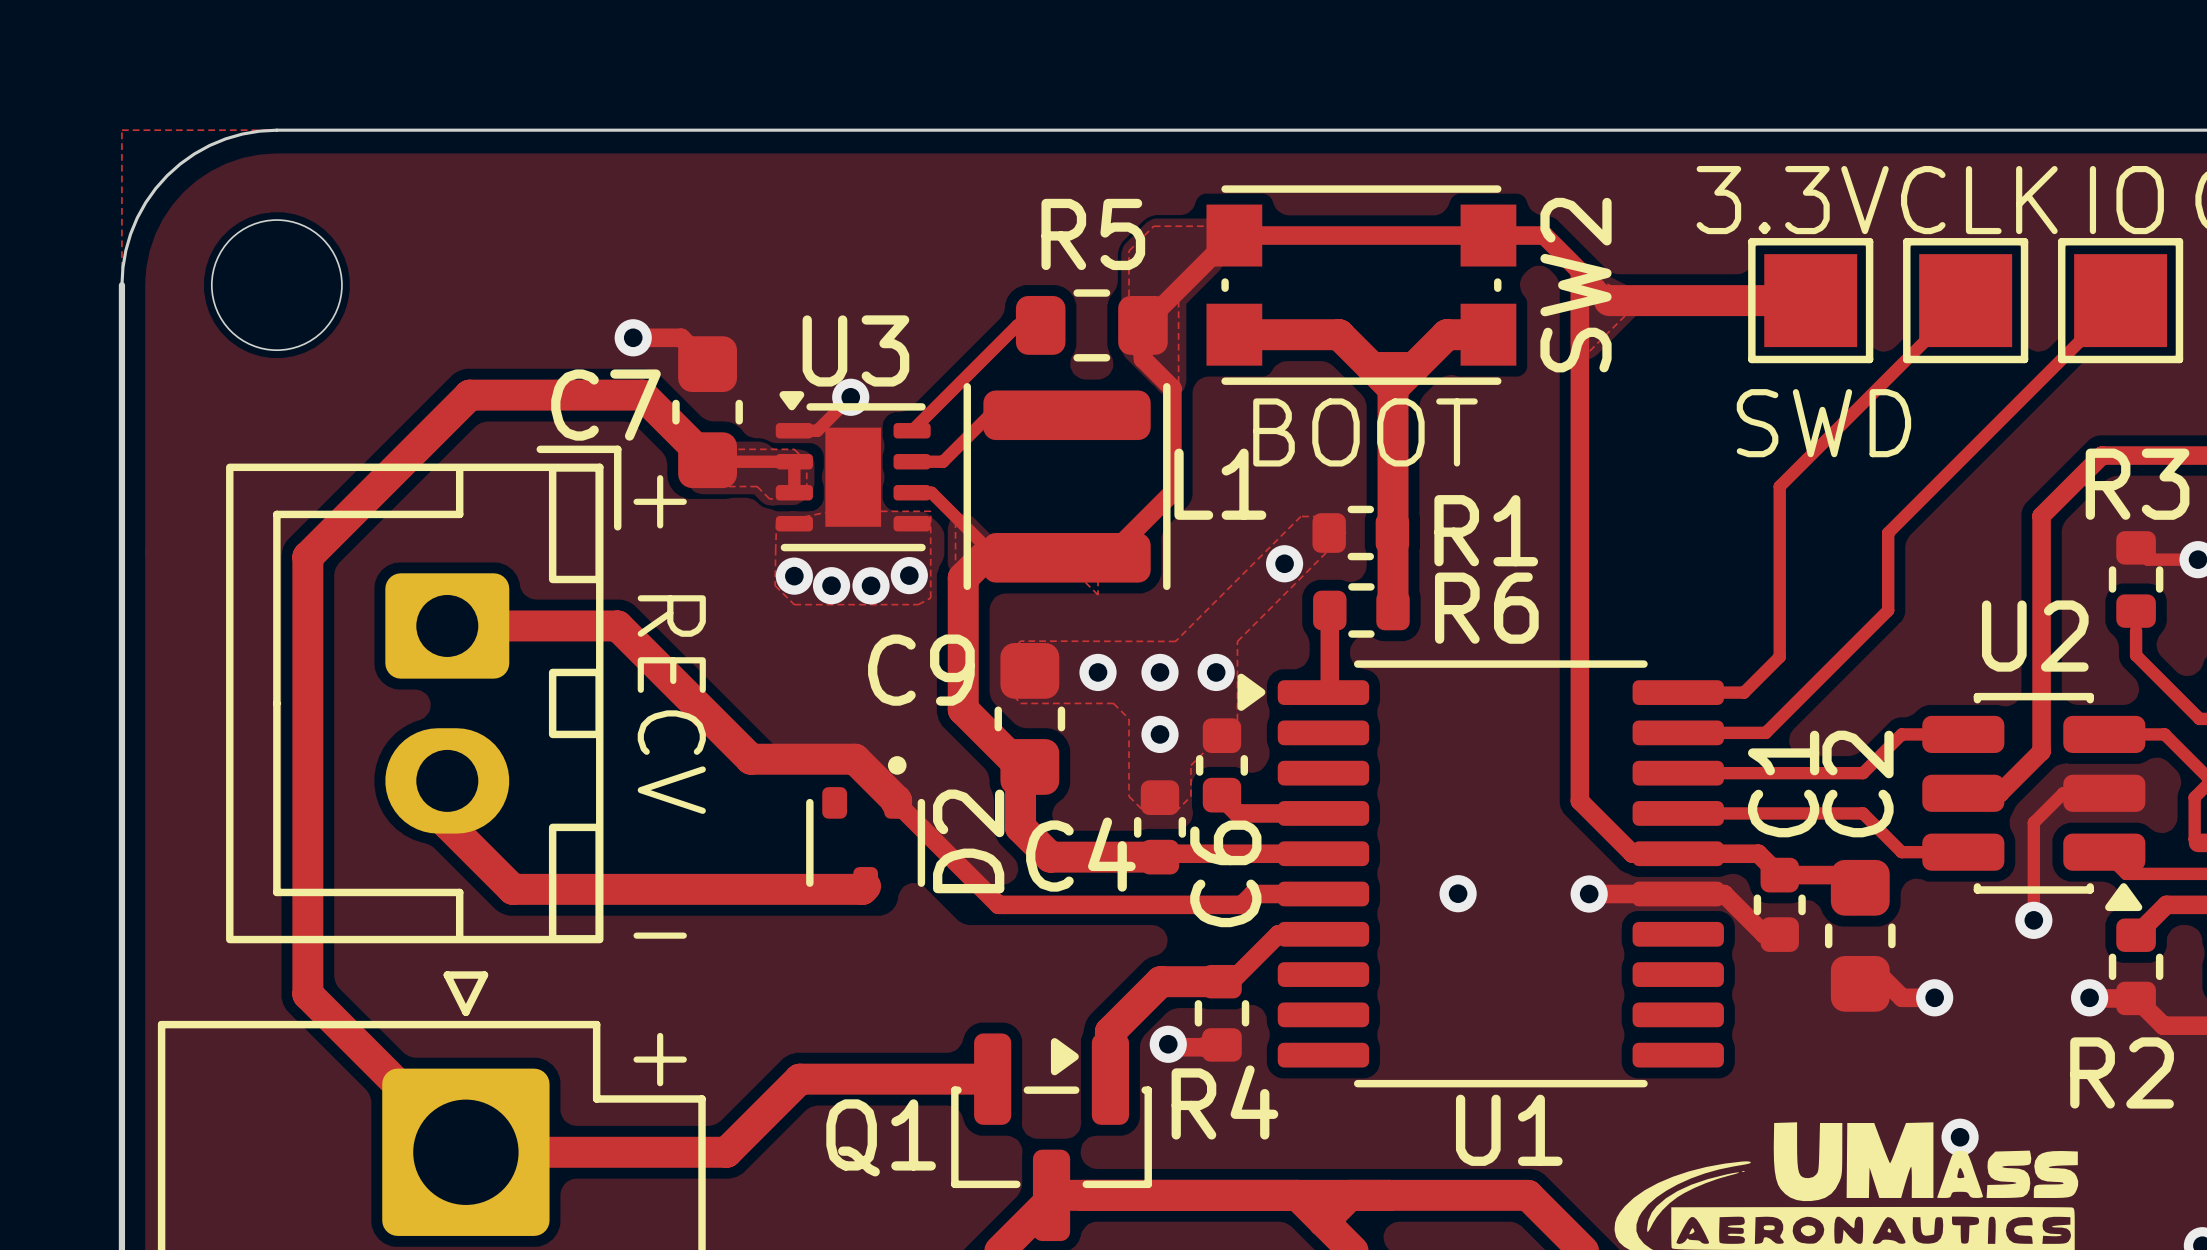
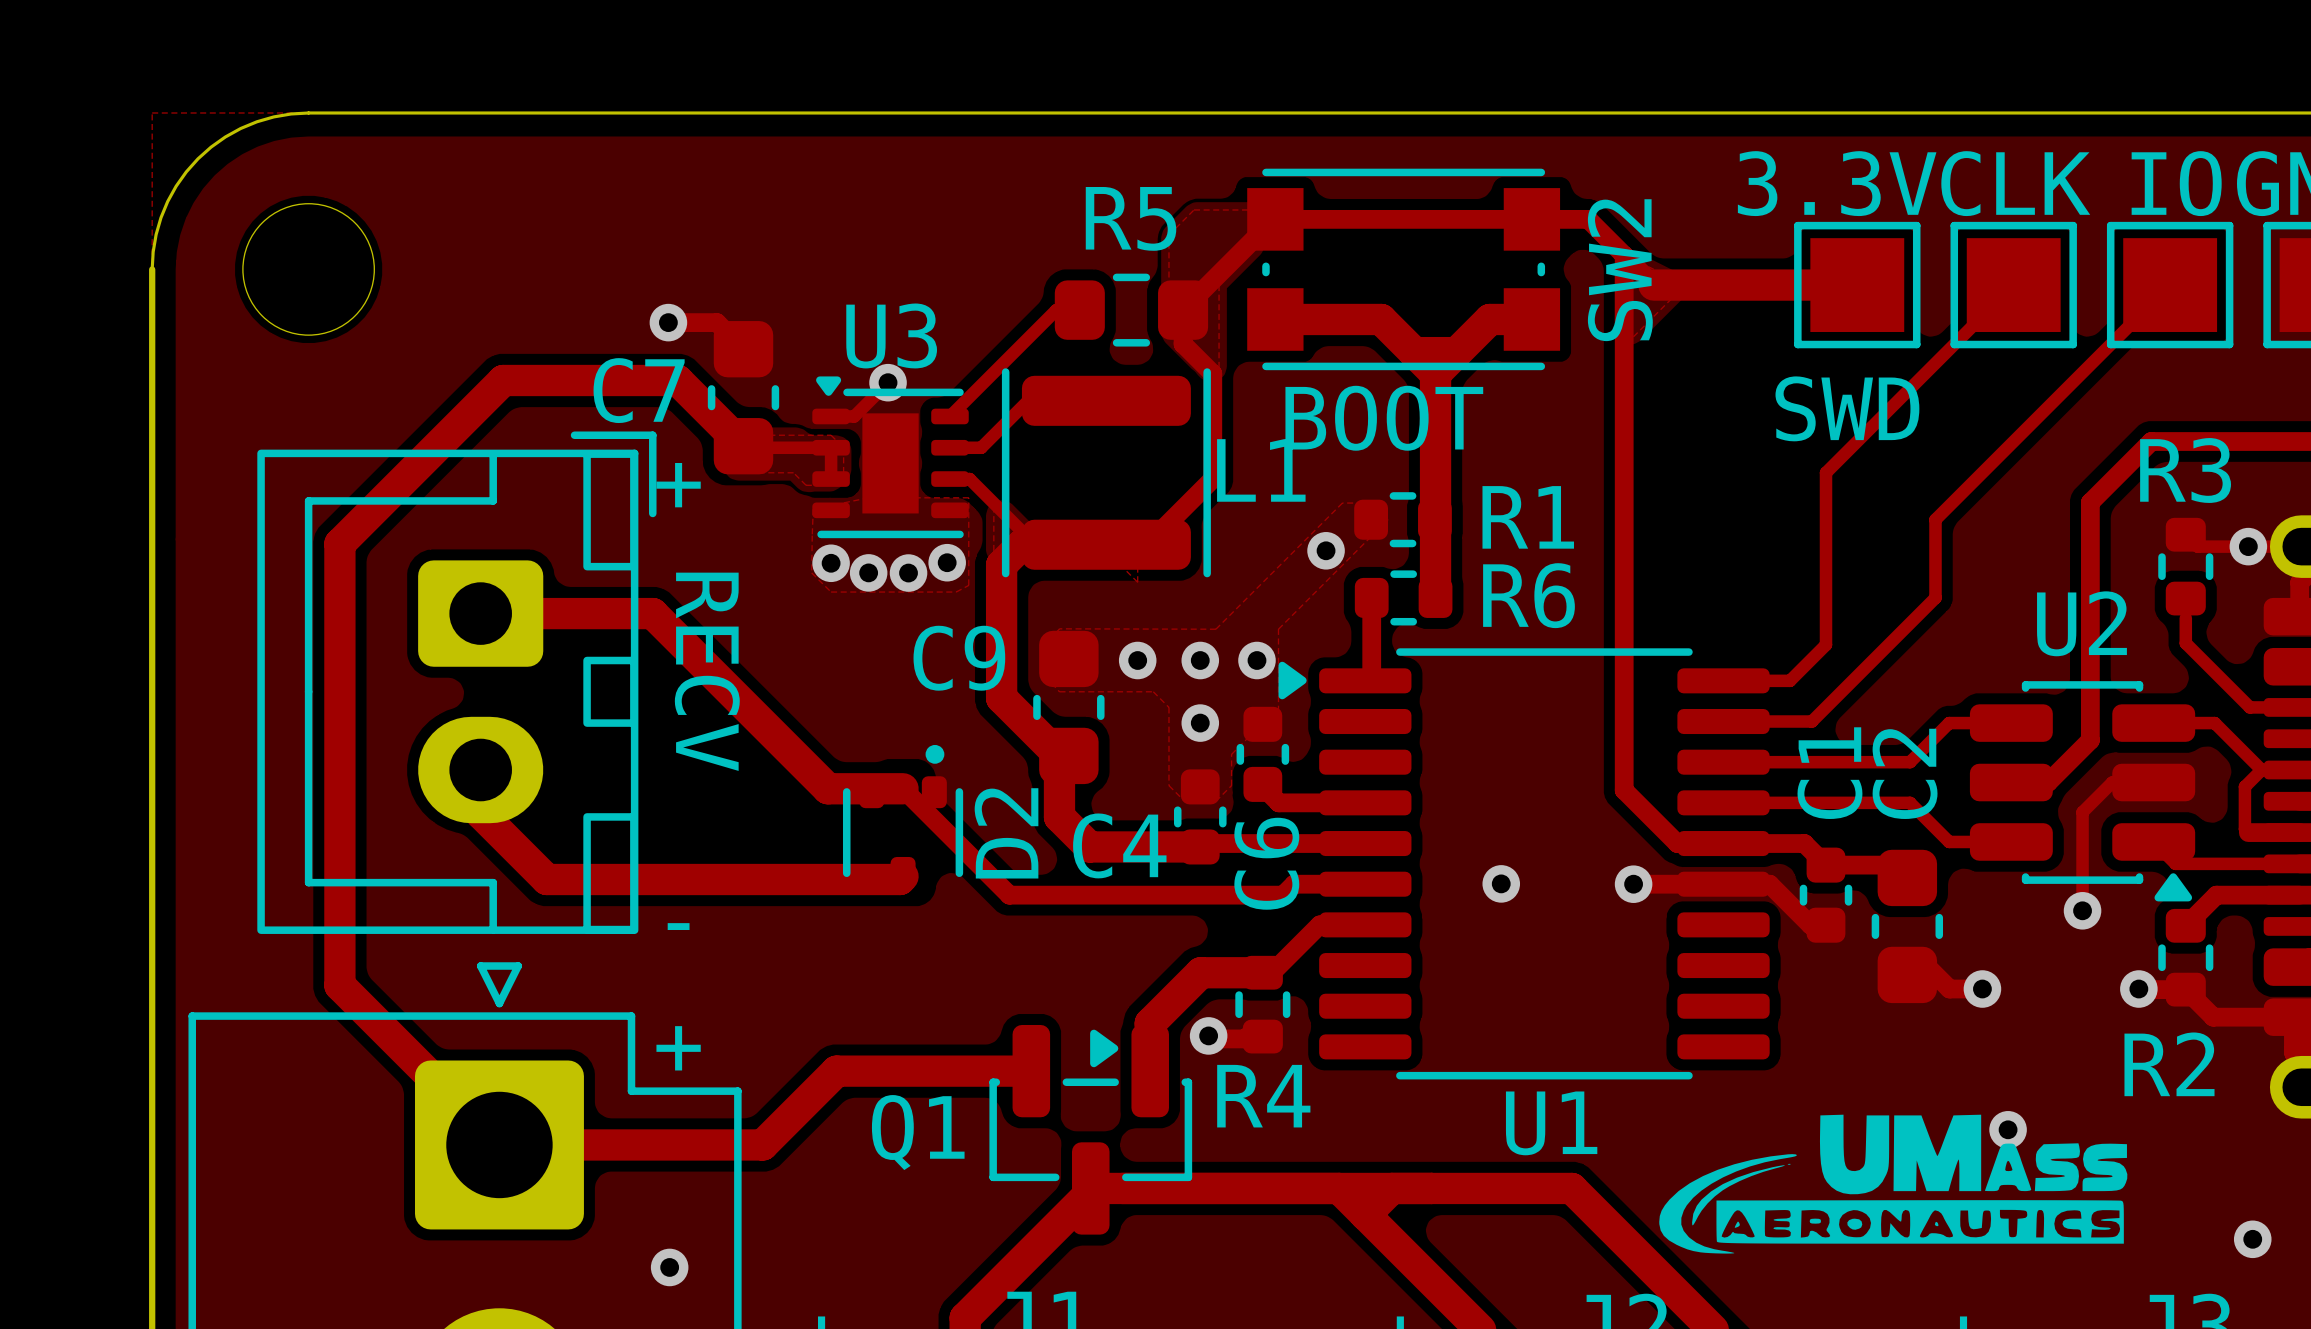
track: (750, 759) (855, 759) (998, 904) -> (787, 748) (827, 788) (903, 788) (1009, 895) (1037, 895)

